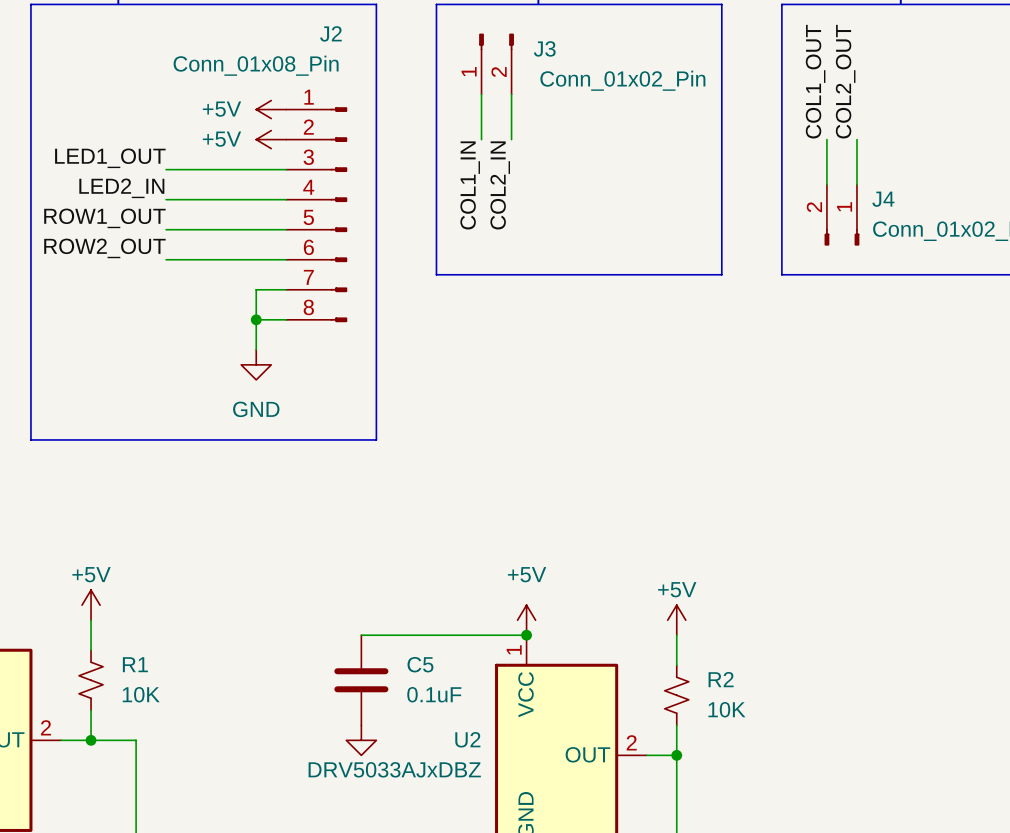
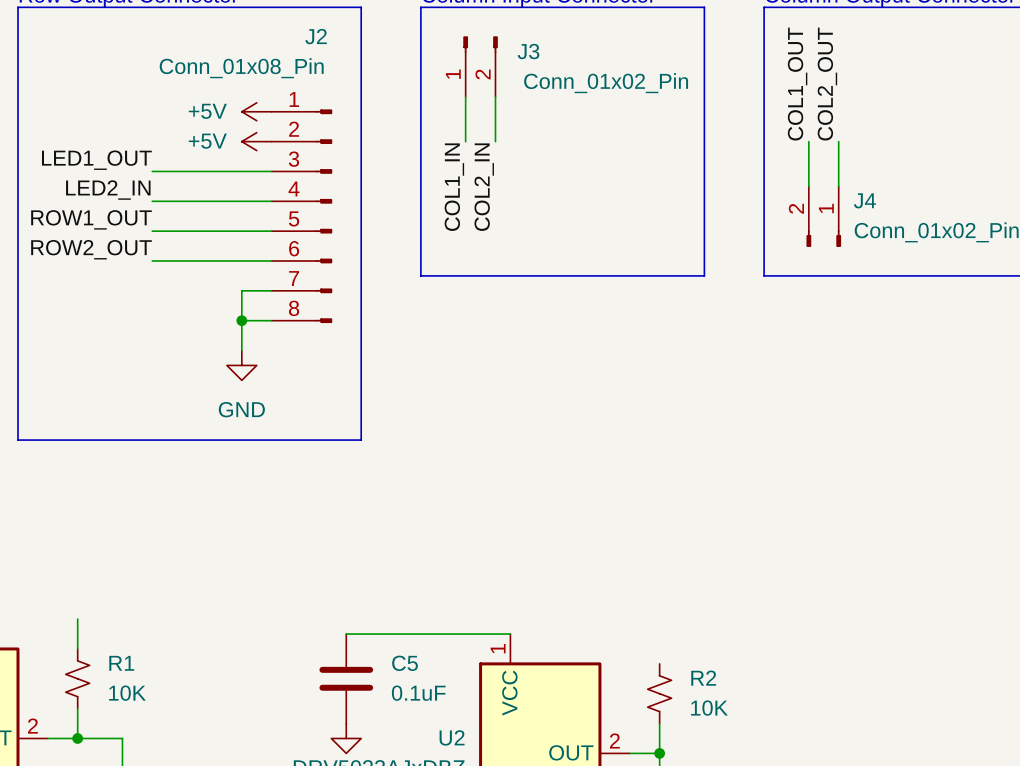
power symbol: +5V (91, 605) -> none
power symbol: +5V (526, 620) -> none
power symbol: +5V (676, 620) -> none
junction: (526, 635) -> none
wire: (676, 635) (676, 665) -> none

